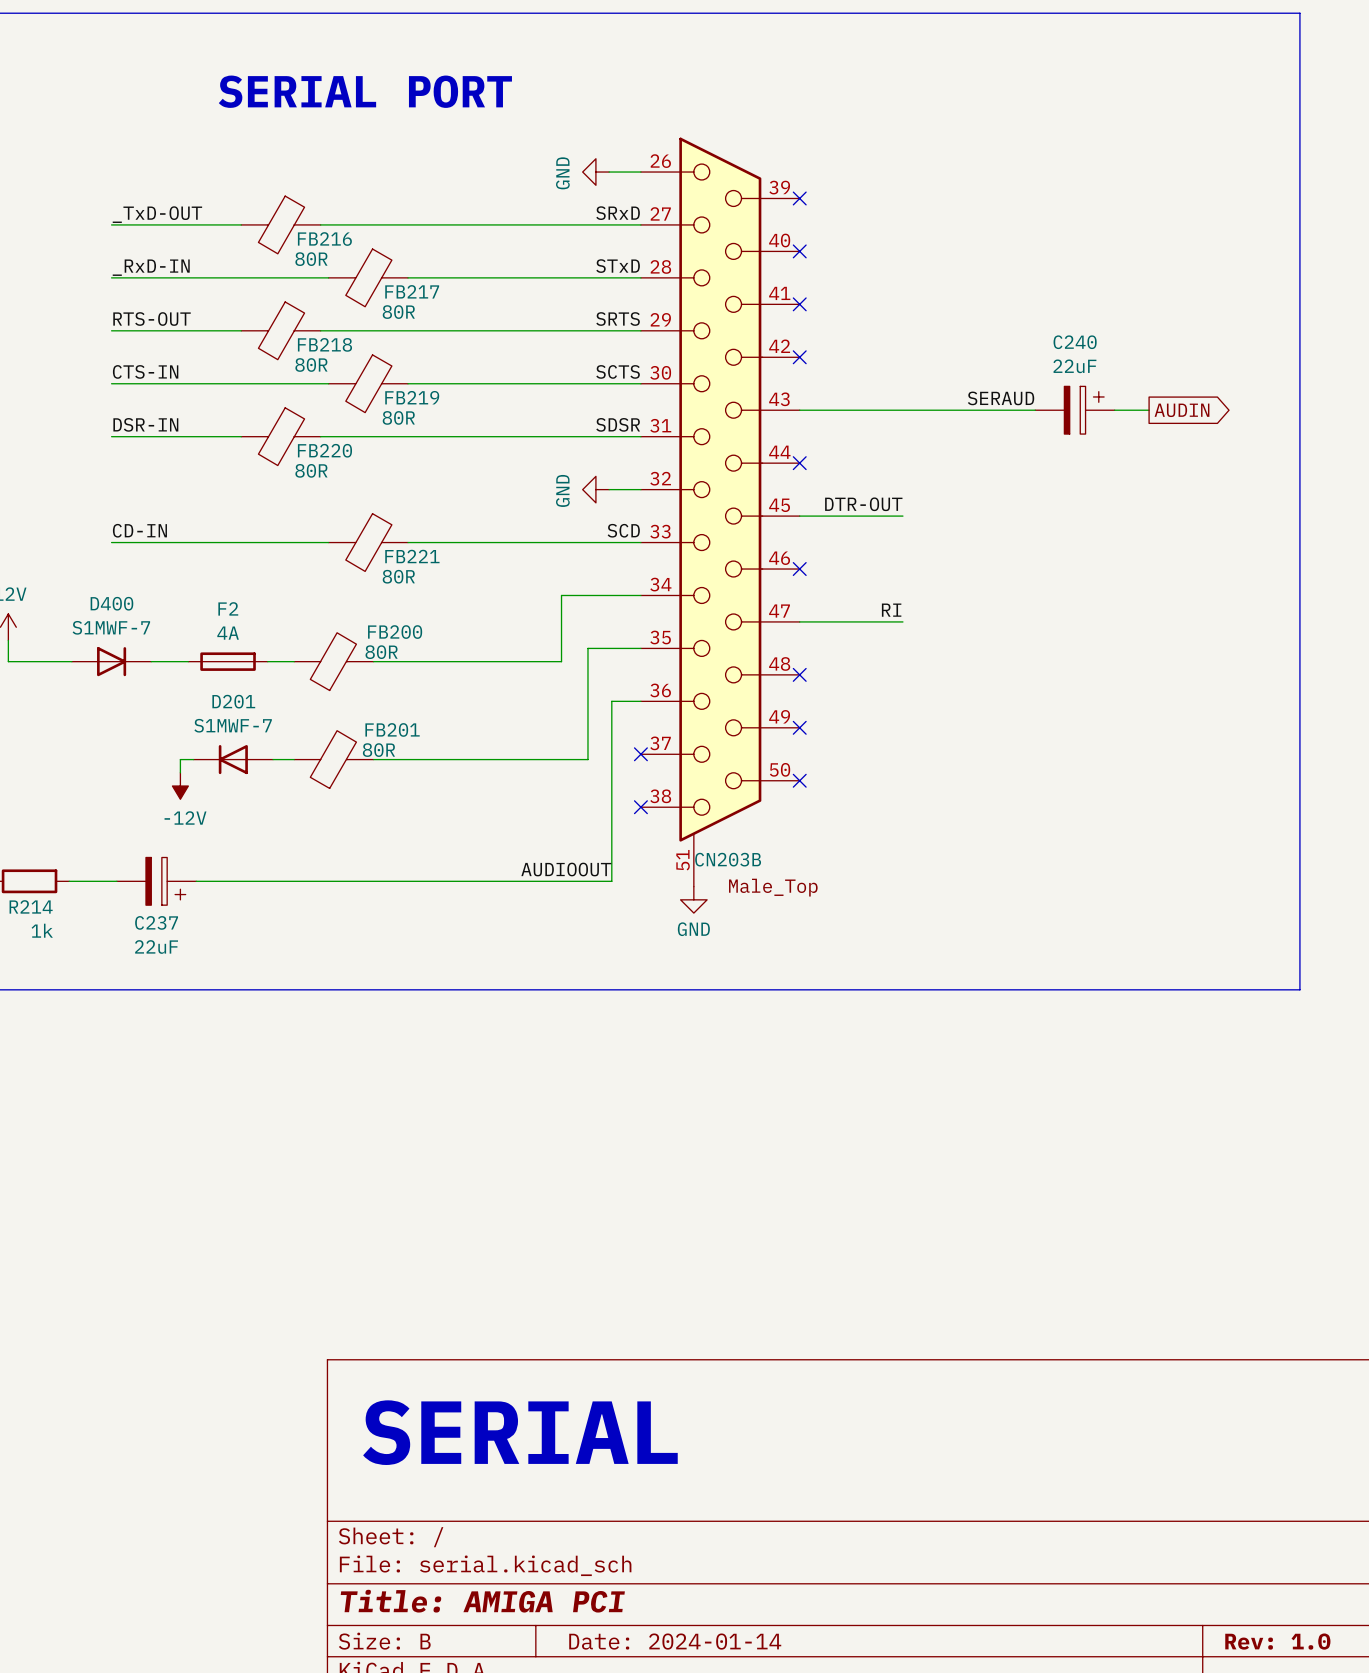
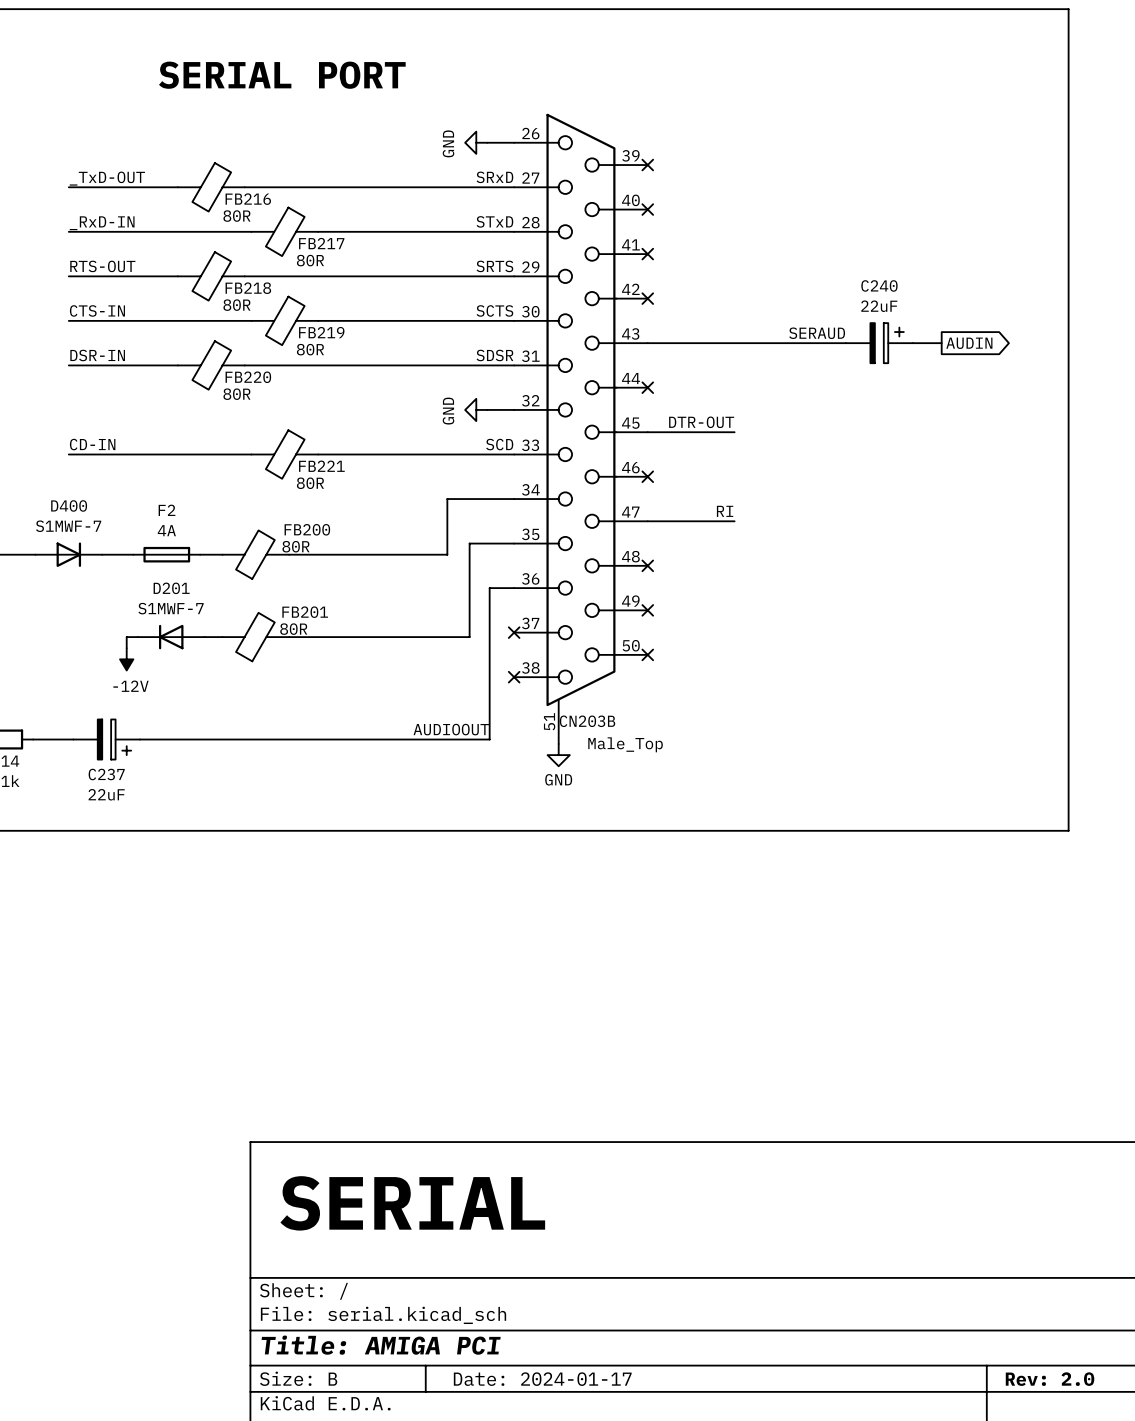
title block: Date: 2024-01-14 (675, 1641) -> Date: 2024-01-17 (542, 1379)
title block: Rev: 1.0 (1277, 1641) -> Rev: 2.0 (1050, 1379)

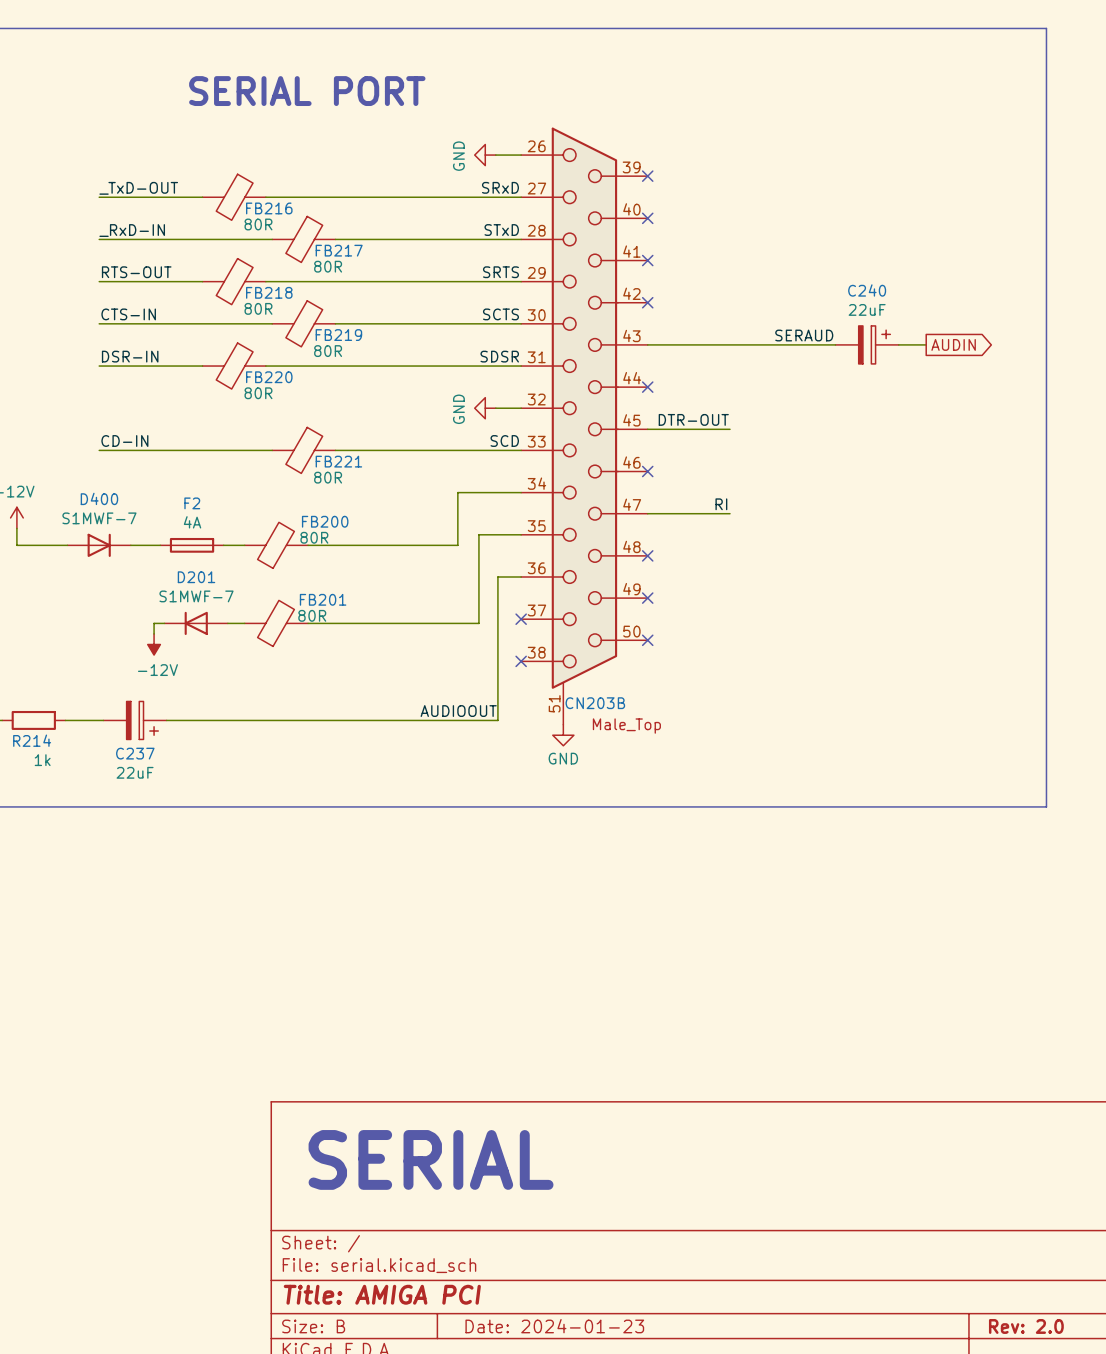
title block: Date: 2024-01-17 (542, 1379) -> Date: 2024-01-23 (554, 1326)

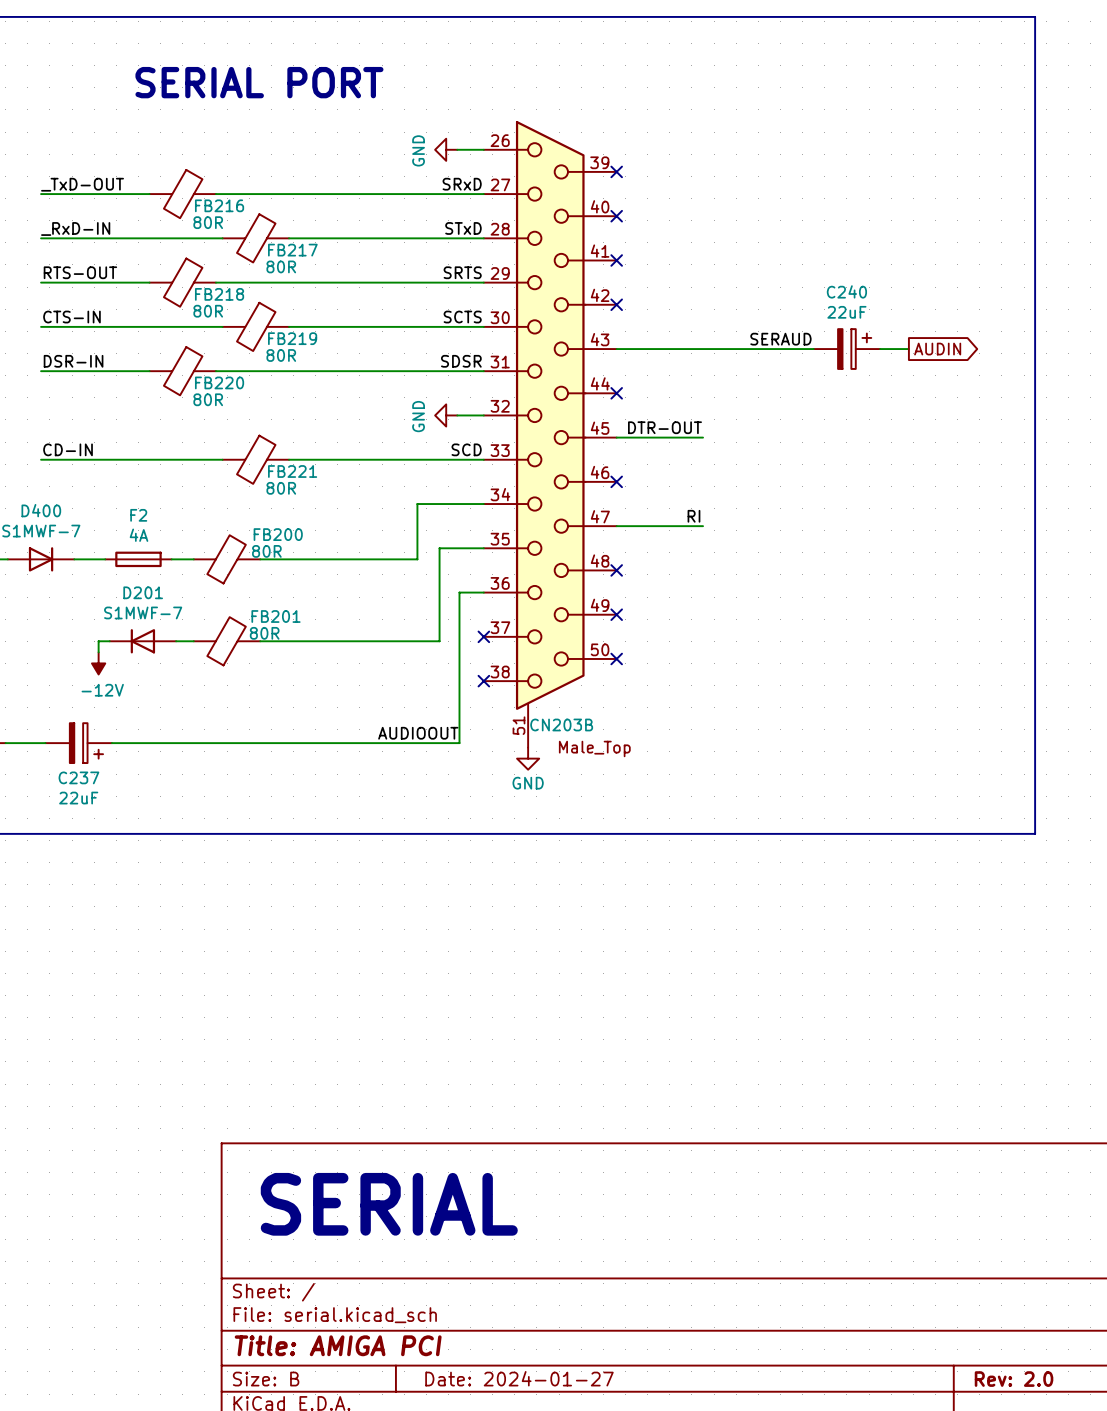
title block: Date: 2024-01-23 (554, 1326) -> Date: 2024-01-27 (519, 1378)

